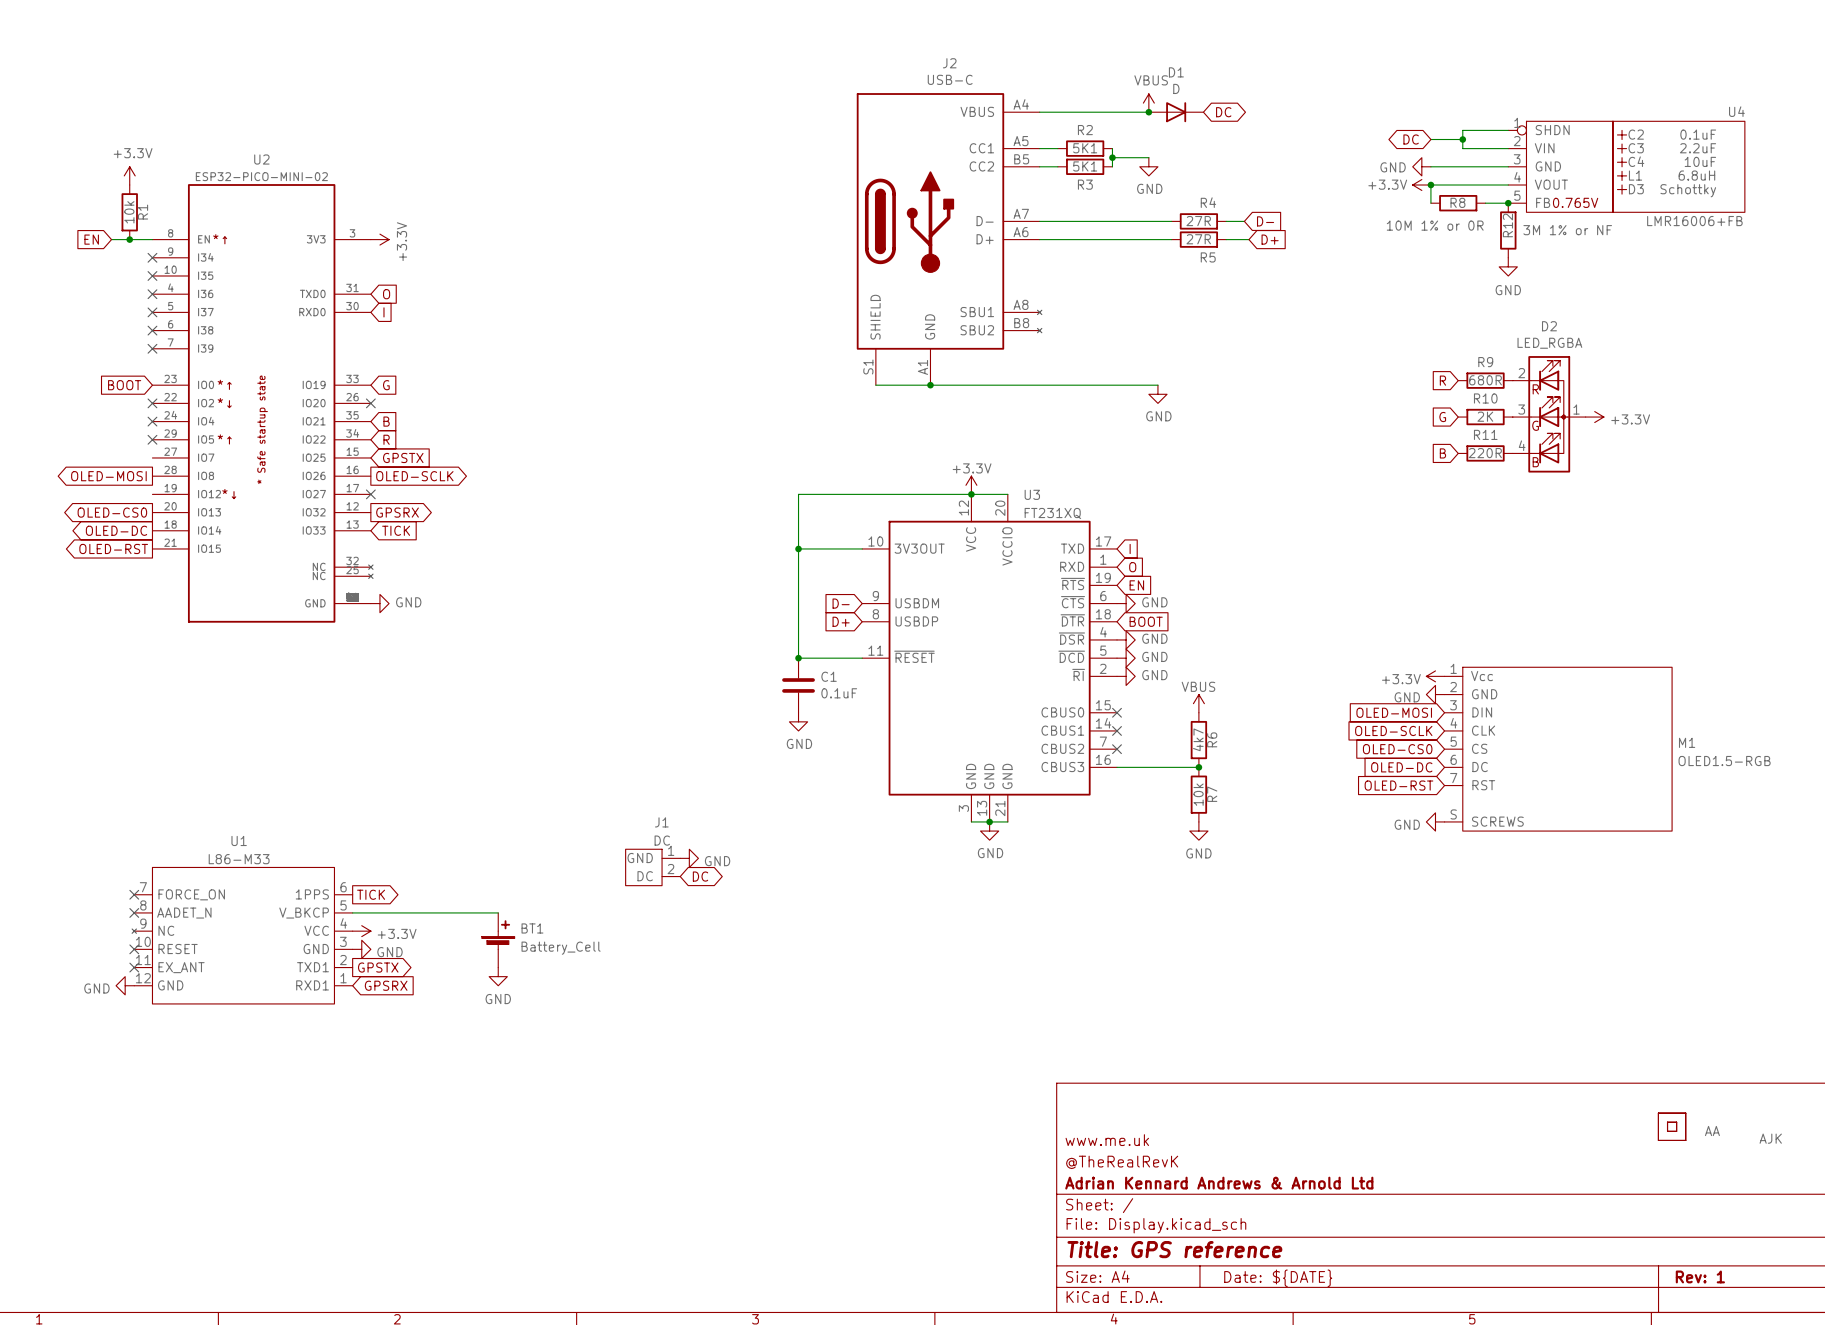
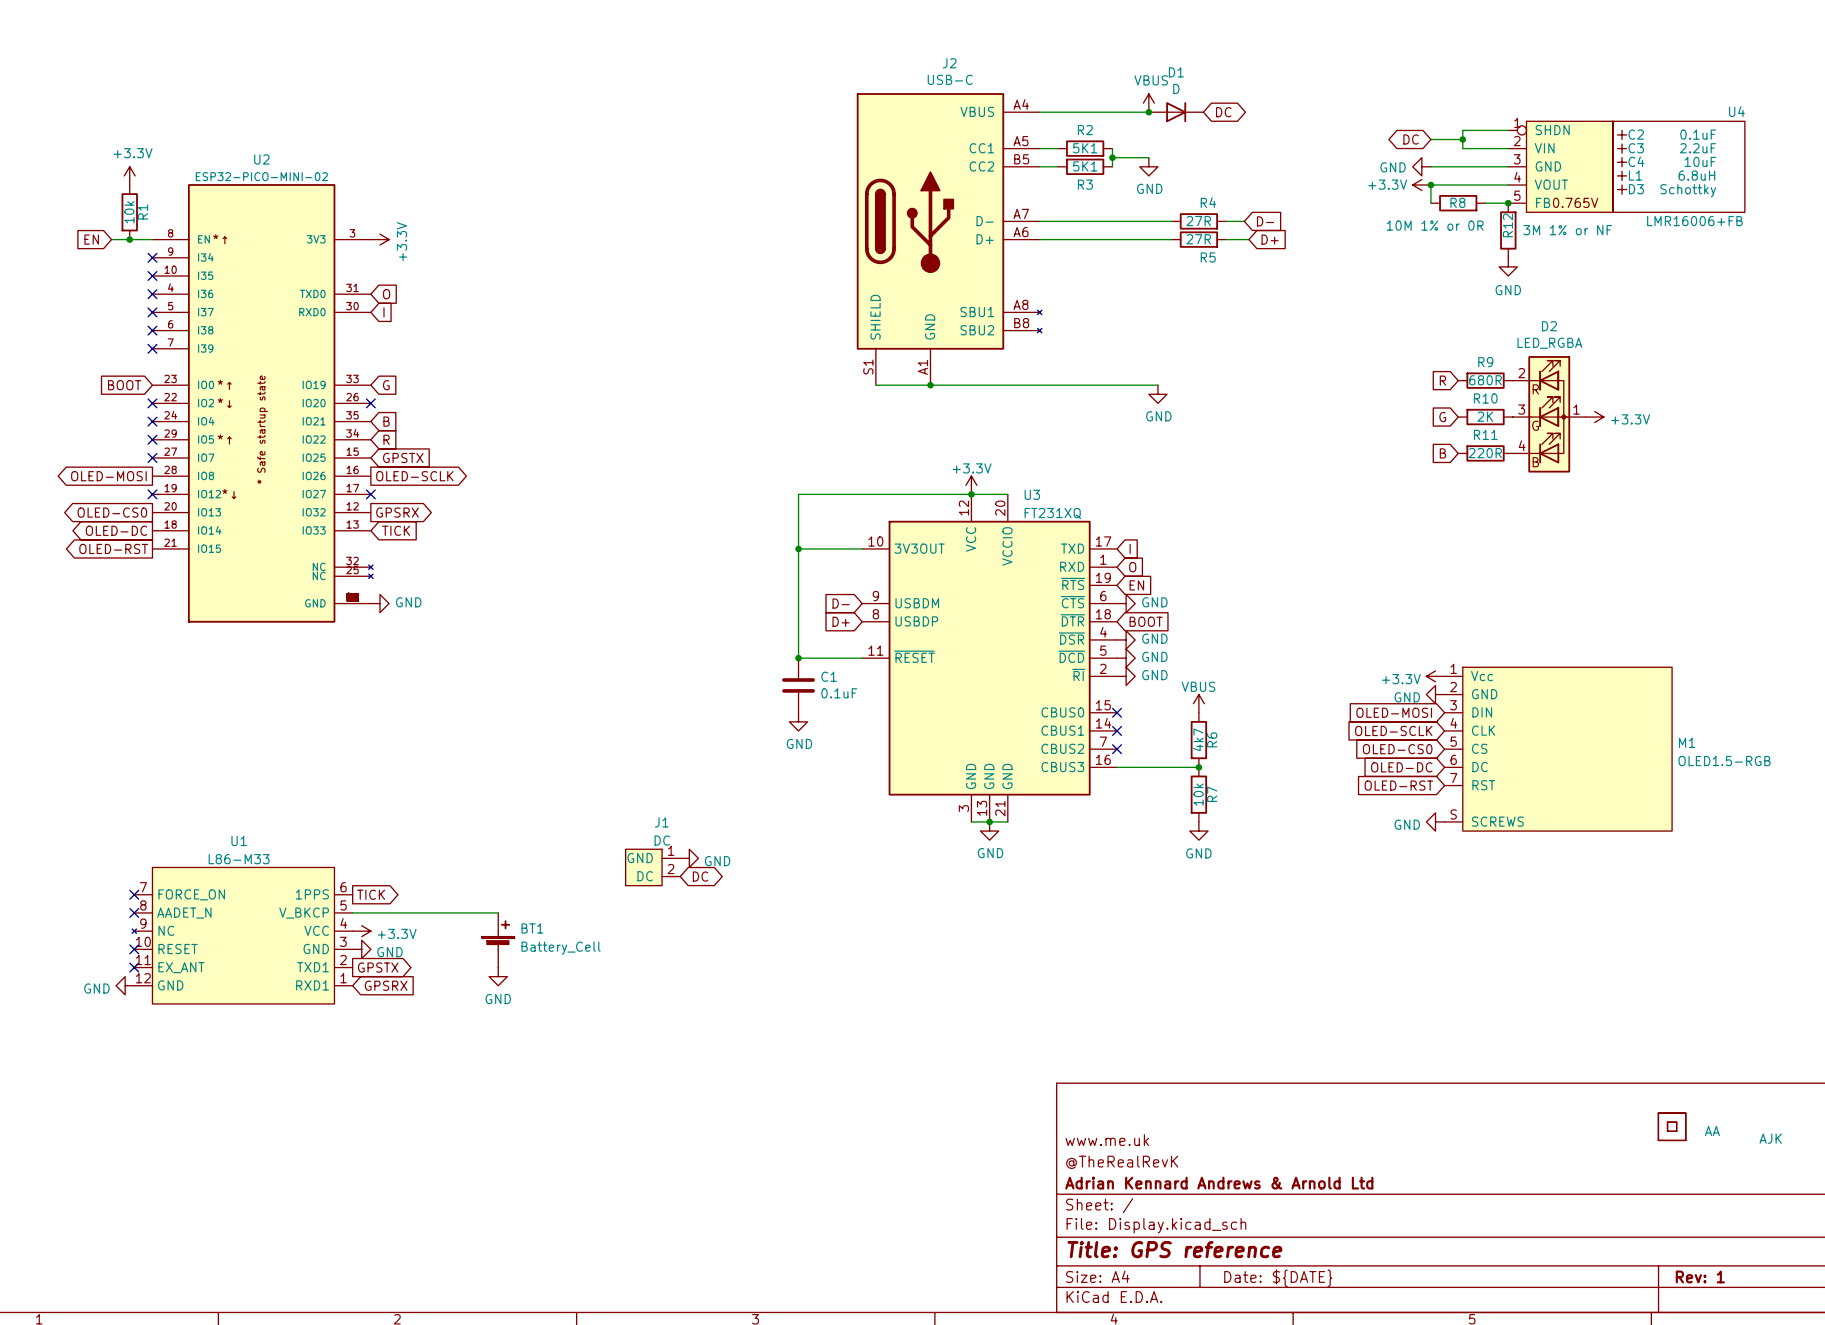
no-connect mark: none -> (152, 457)
no-connect mark: none -> (152, 494)

